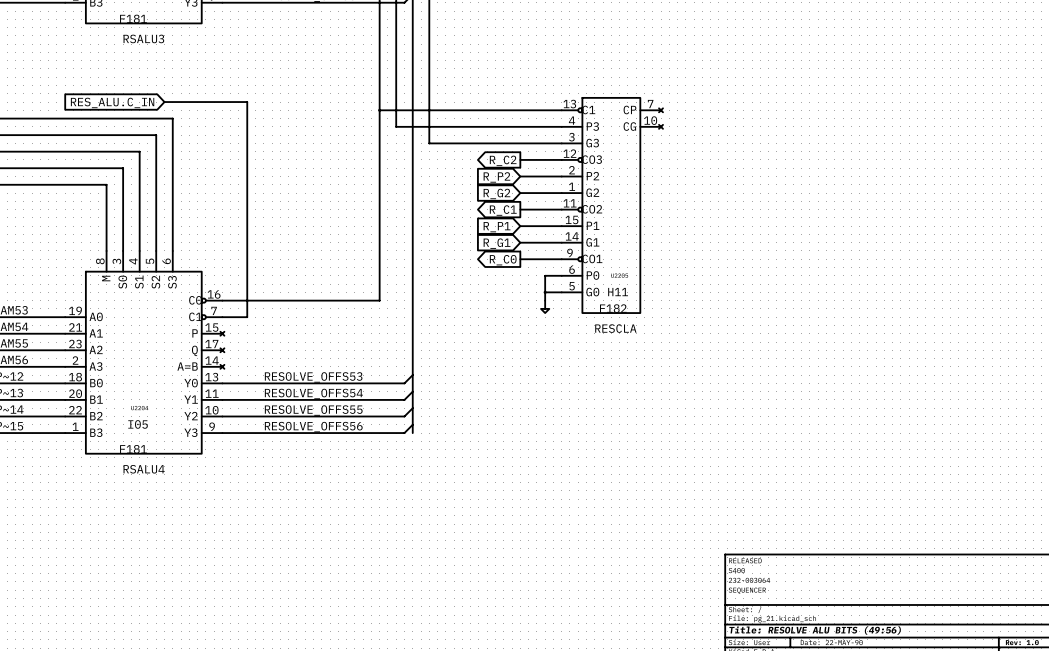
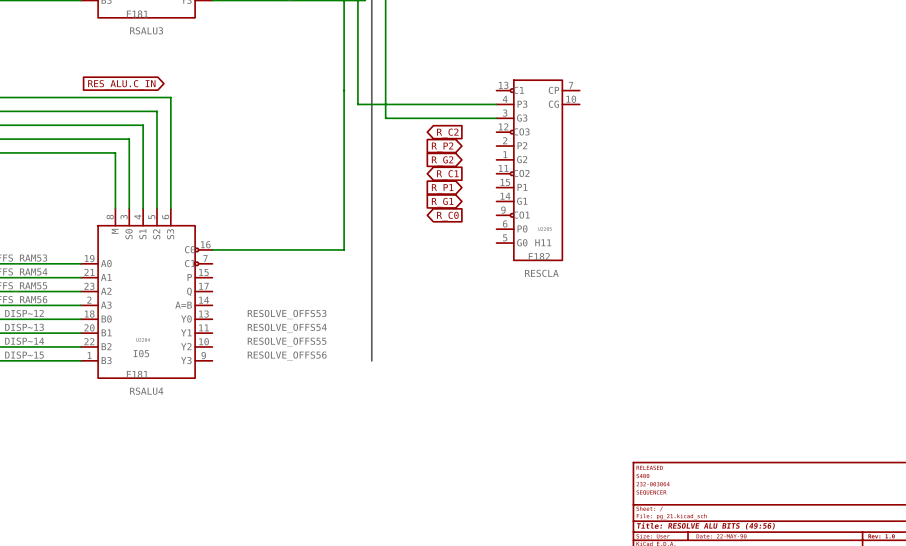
wire: (164, 102) (247, 102) (247, 317) (222, 317) -> none
wire: (379, 110) (561, 110) -> none
no-connect mark: (661, 110) -> none
no-connect mark: (661, 126) -> none
wire: (520, 159) (561, 159) -> none
wire: (520, 176) (561, 176) -> none
wire: (520, 193) (561, 193) -> none
wire: (520, 209) (561, 209) -> none
wire: (520, 226) (561, 226) -> none
wire: (520, 242) (561, 242) -> none
wire: (520, 259) (561, 259) -> none
wire: (561, 275) (545, 275) (545, 300) -> none
wire: (545, 292) (561, 292) -> none
power symbol: (545, 306) -> none
no-connect mark: (222, 333) -> none
no-connect mark: (222, 350) -> none
no-connect mark: (222, 366) -> none
wire: (412, 375) (404, 383) (222, 383) -> none
wire: (412, 391) (404, 399) (222, 399) -> none
wire: (412, 408) (404, 416) (222, 416) -> none
wire: (412, 424) (404, 433) (222, 433) -> none

